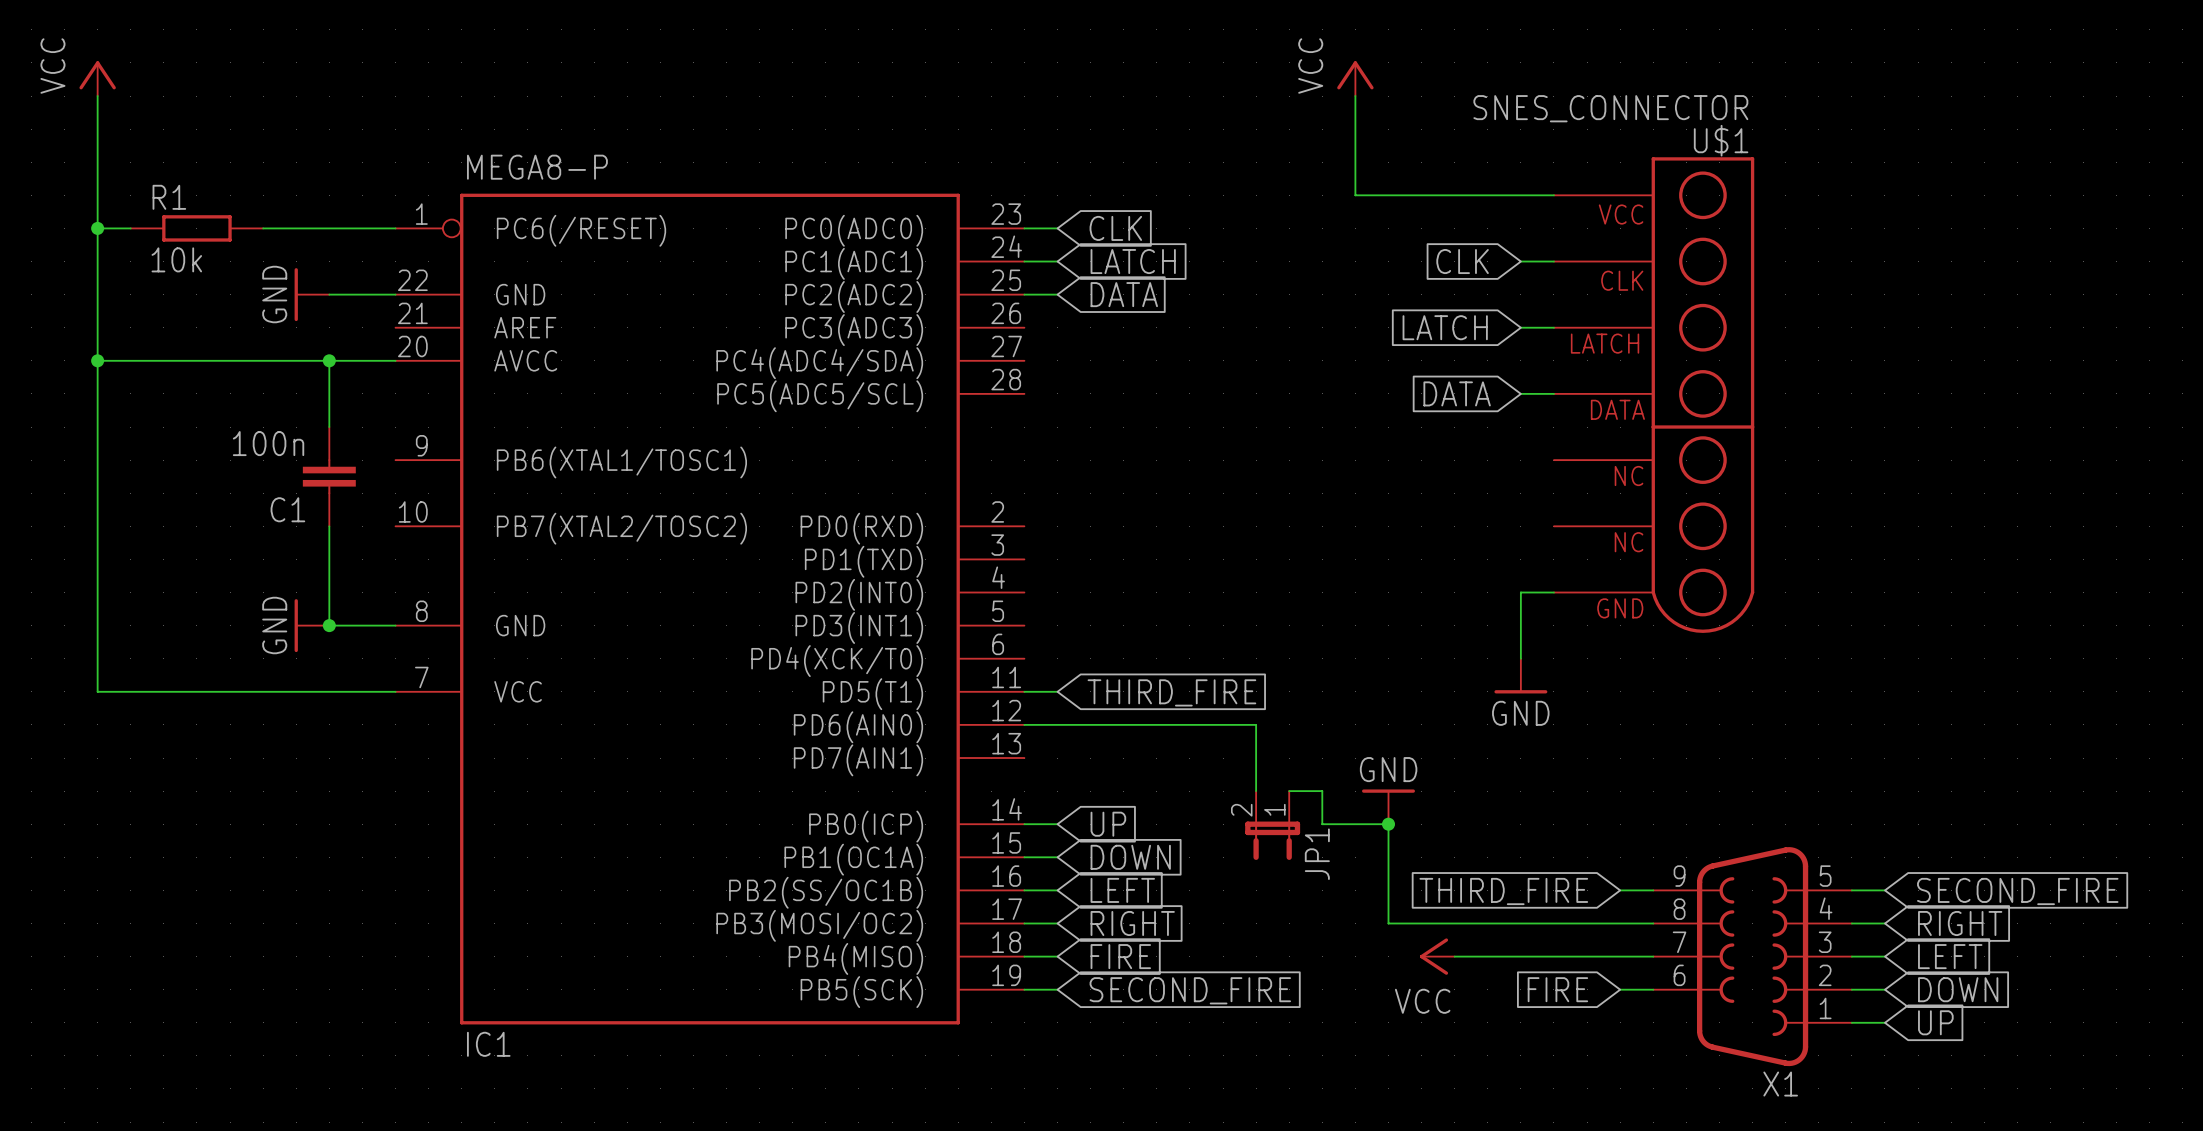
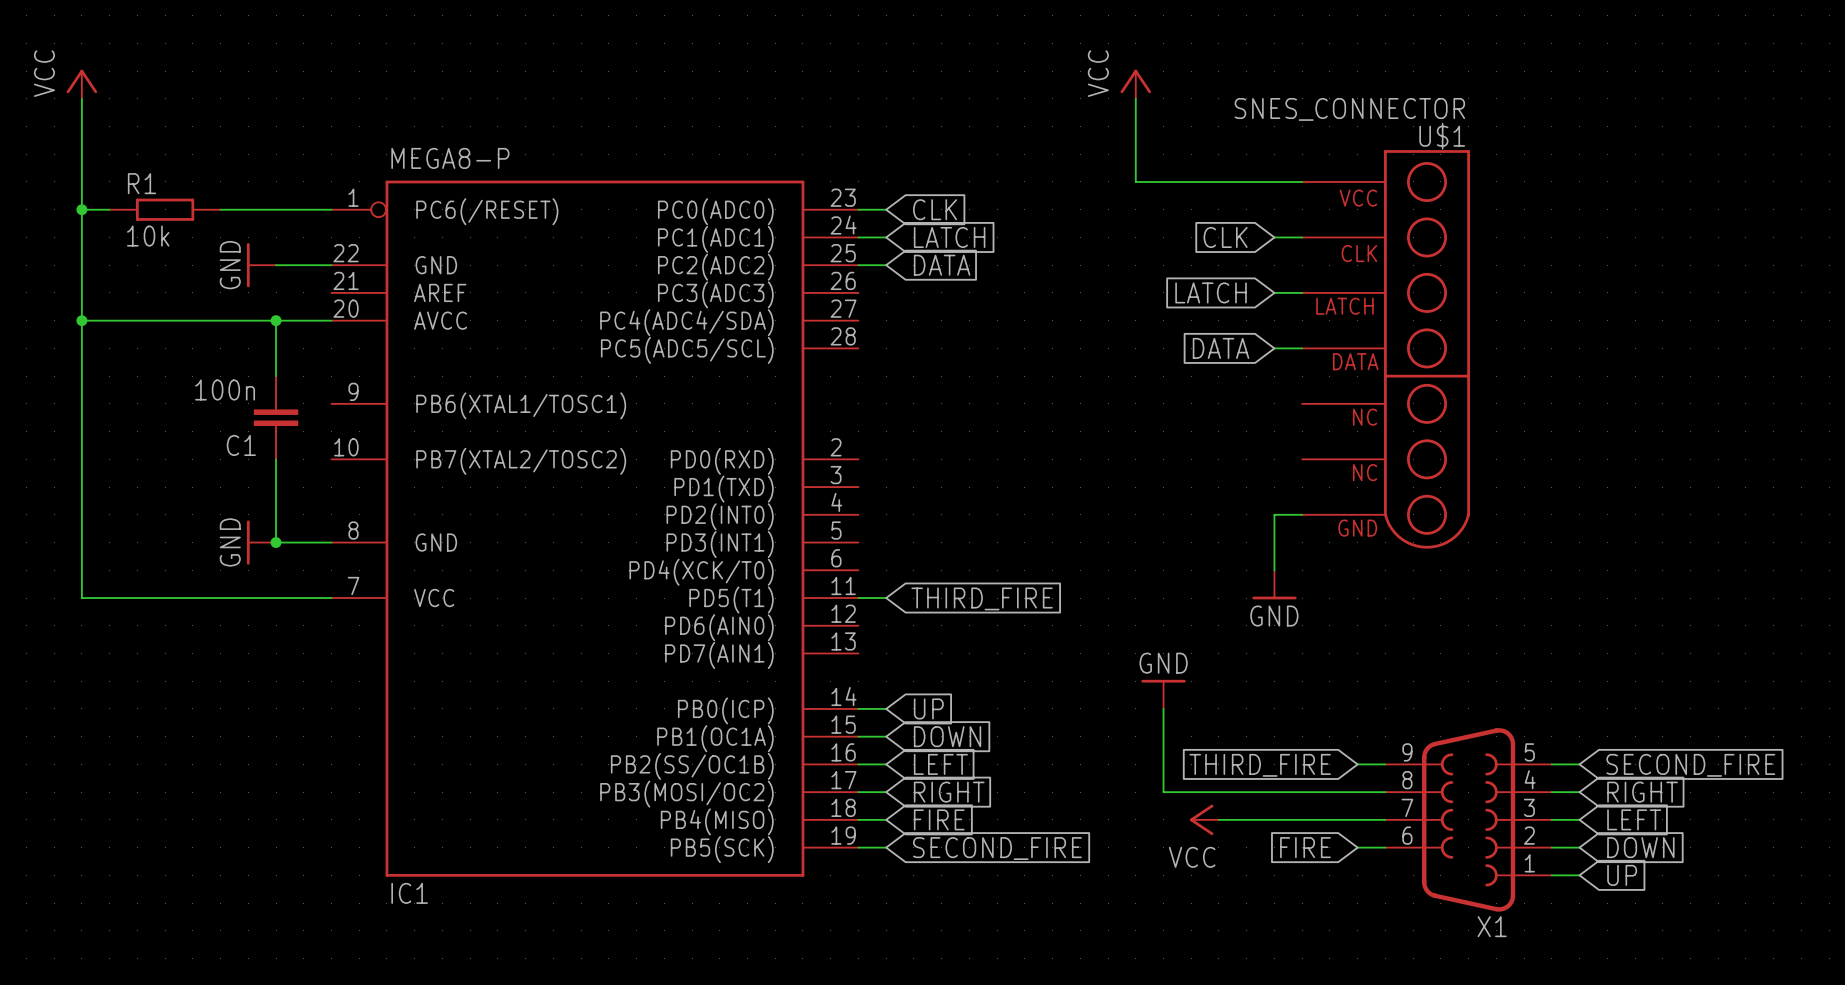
wire: (1024, 724) (1256, 724) (1256, 791) -> none
wire: (1289, 791) (1322, 791) (1322, 824) (1388, 824) -> none
junction: (1388, 824) -> none
JP1: (1272, 825) -> none

